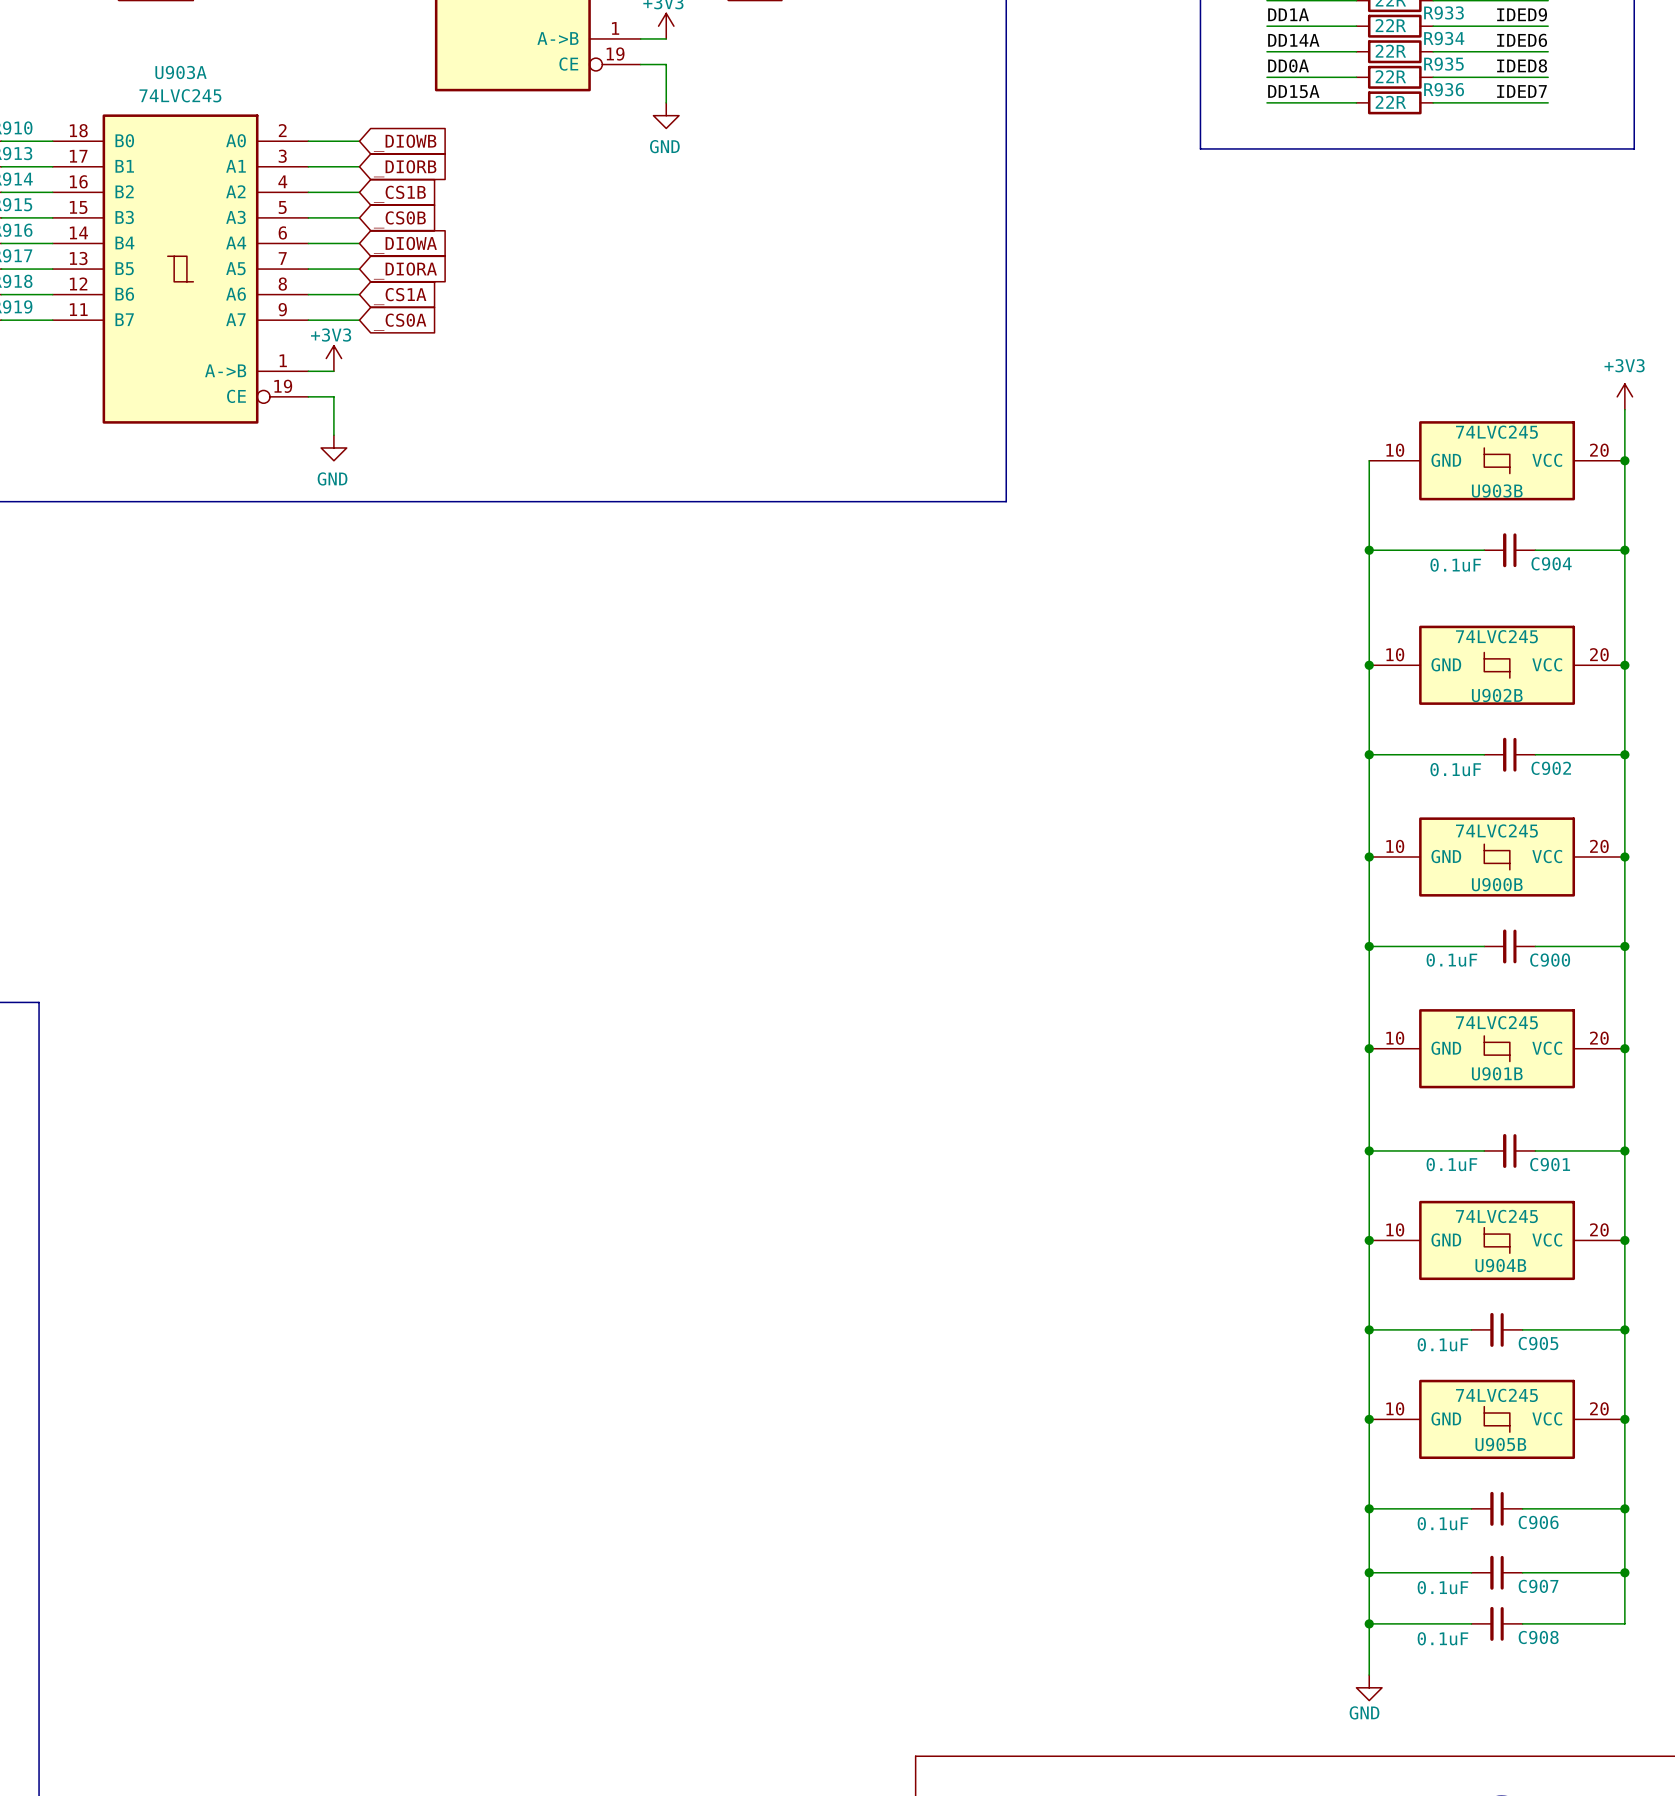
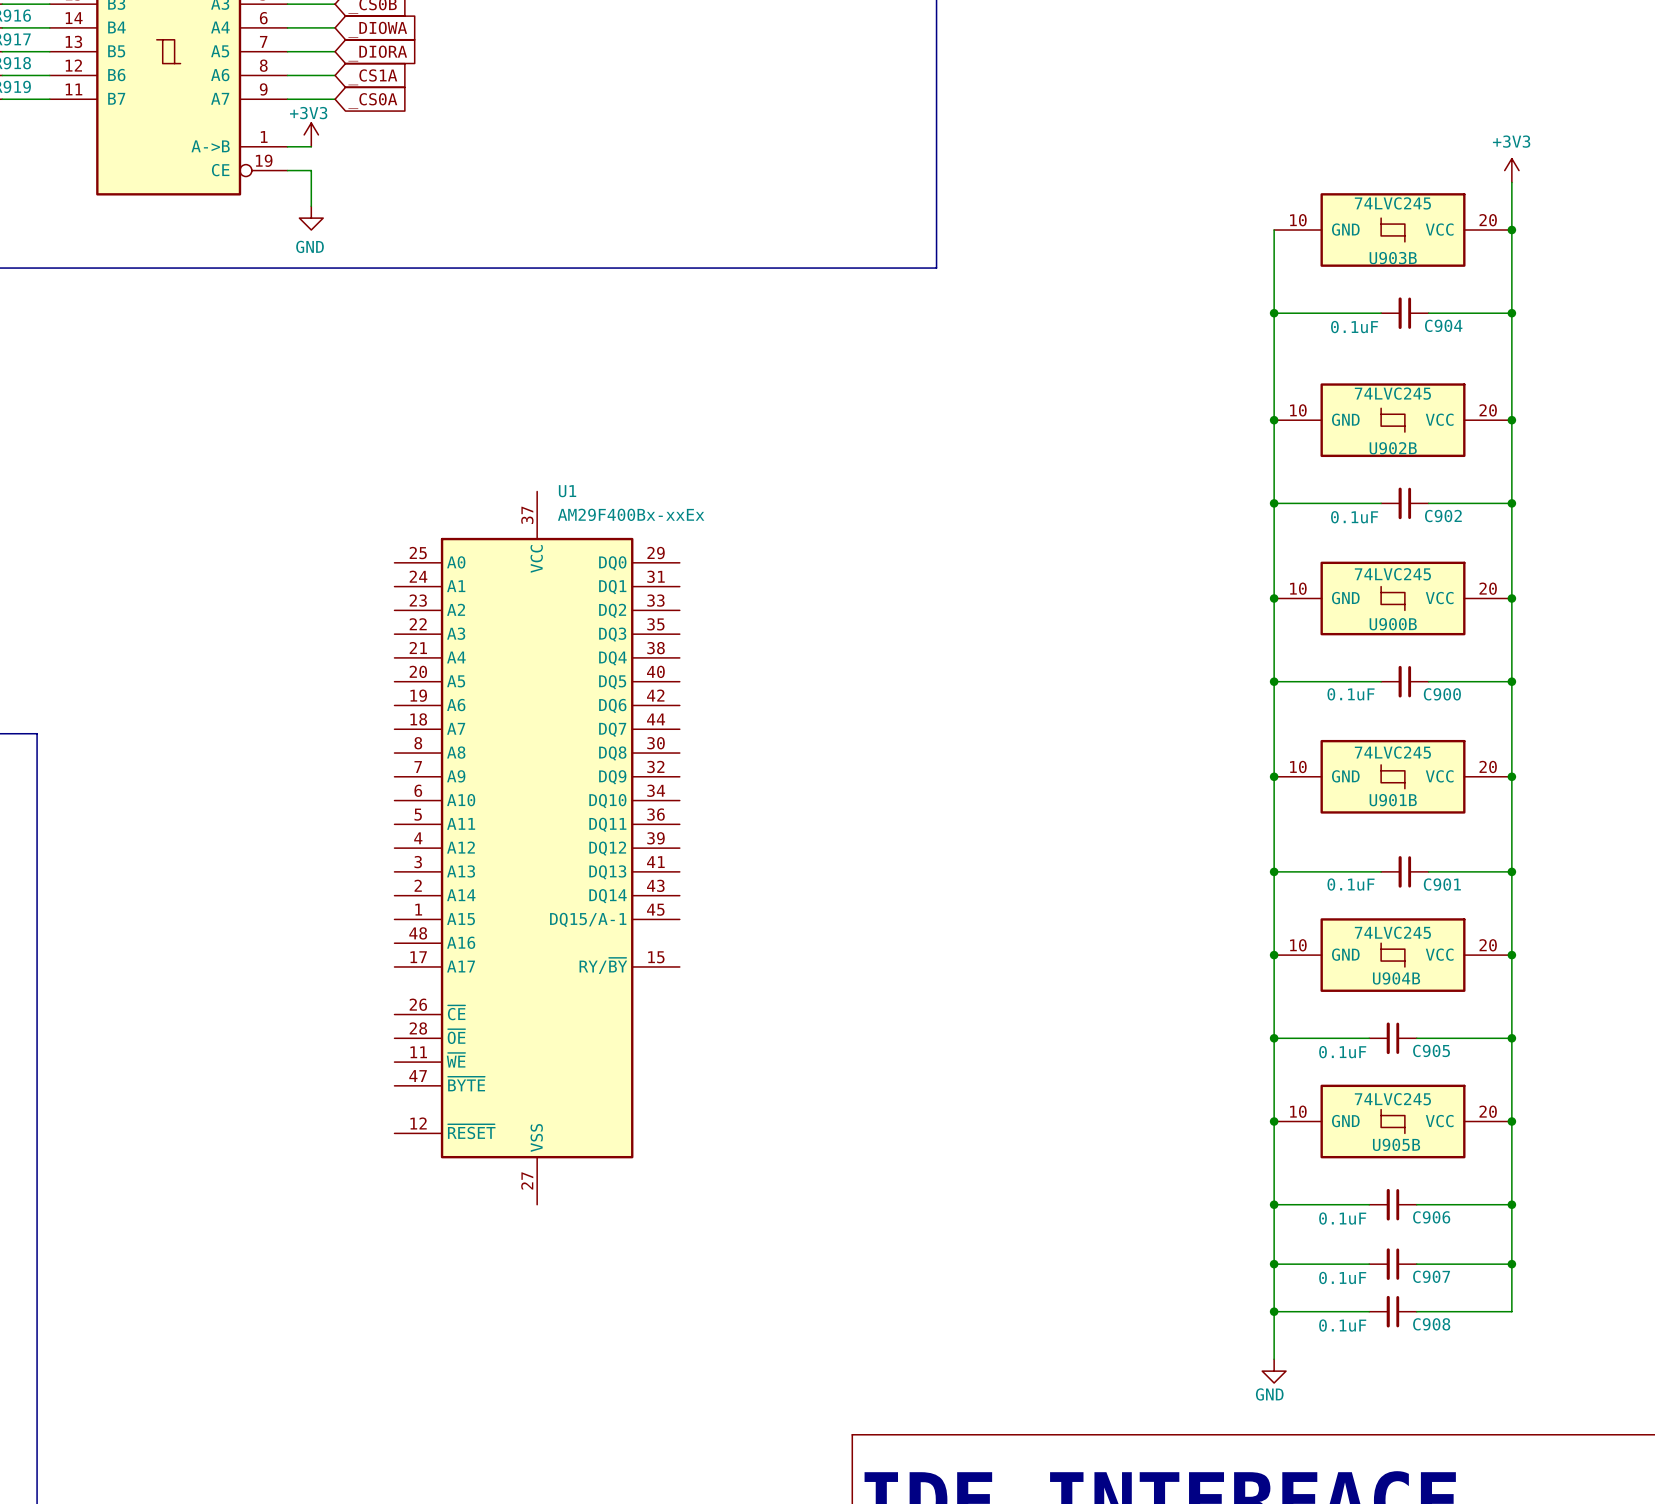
U1: none -> AM29F400Bx-xxEx (537, 848)

